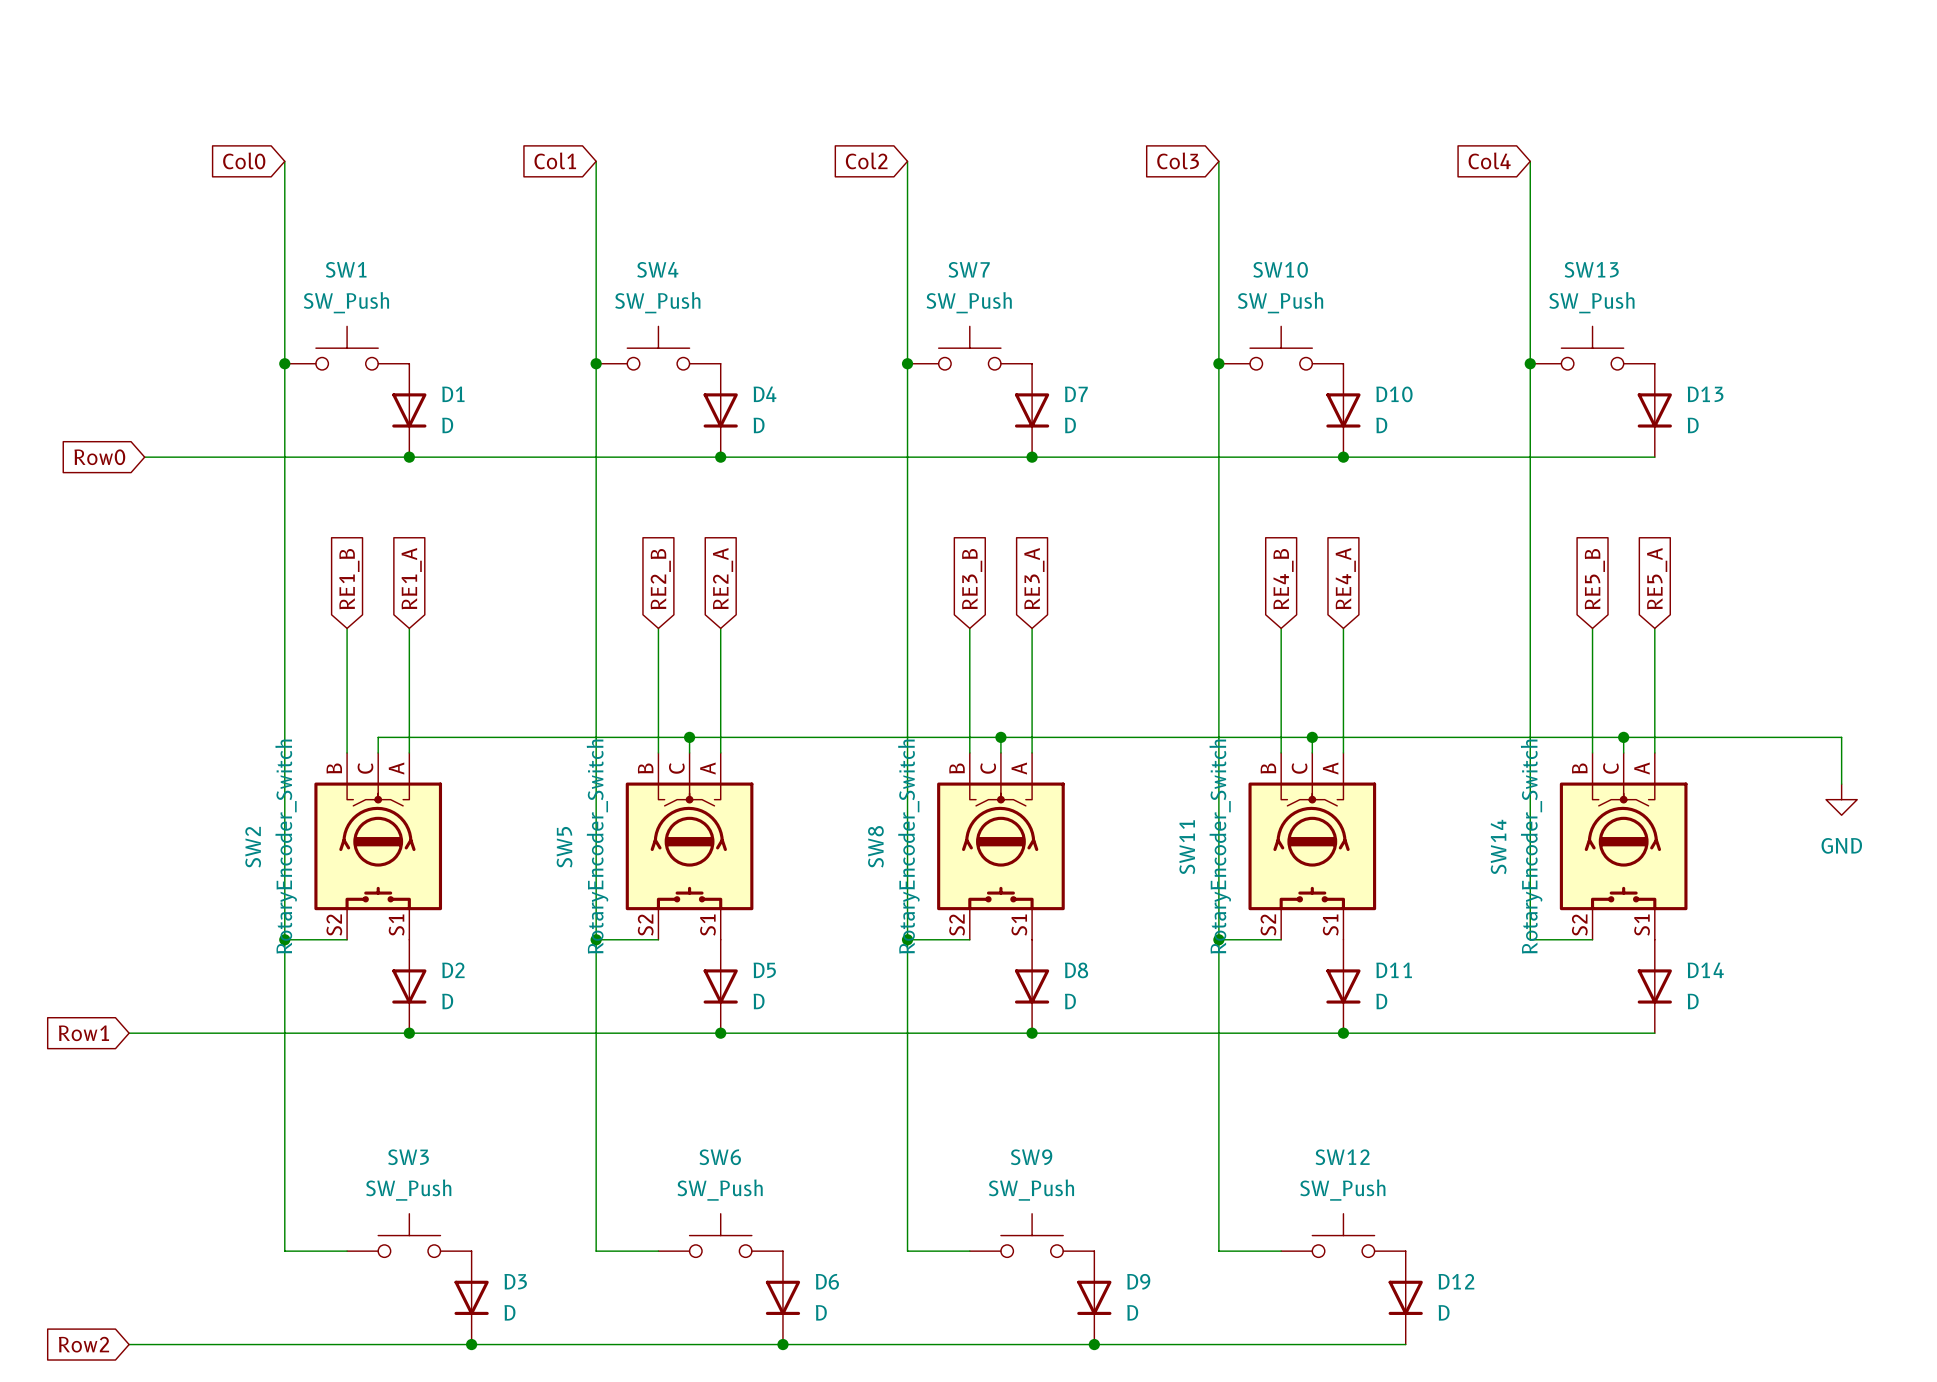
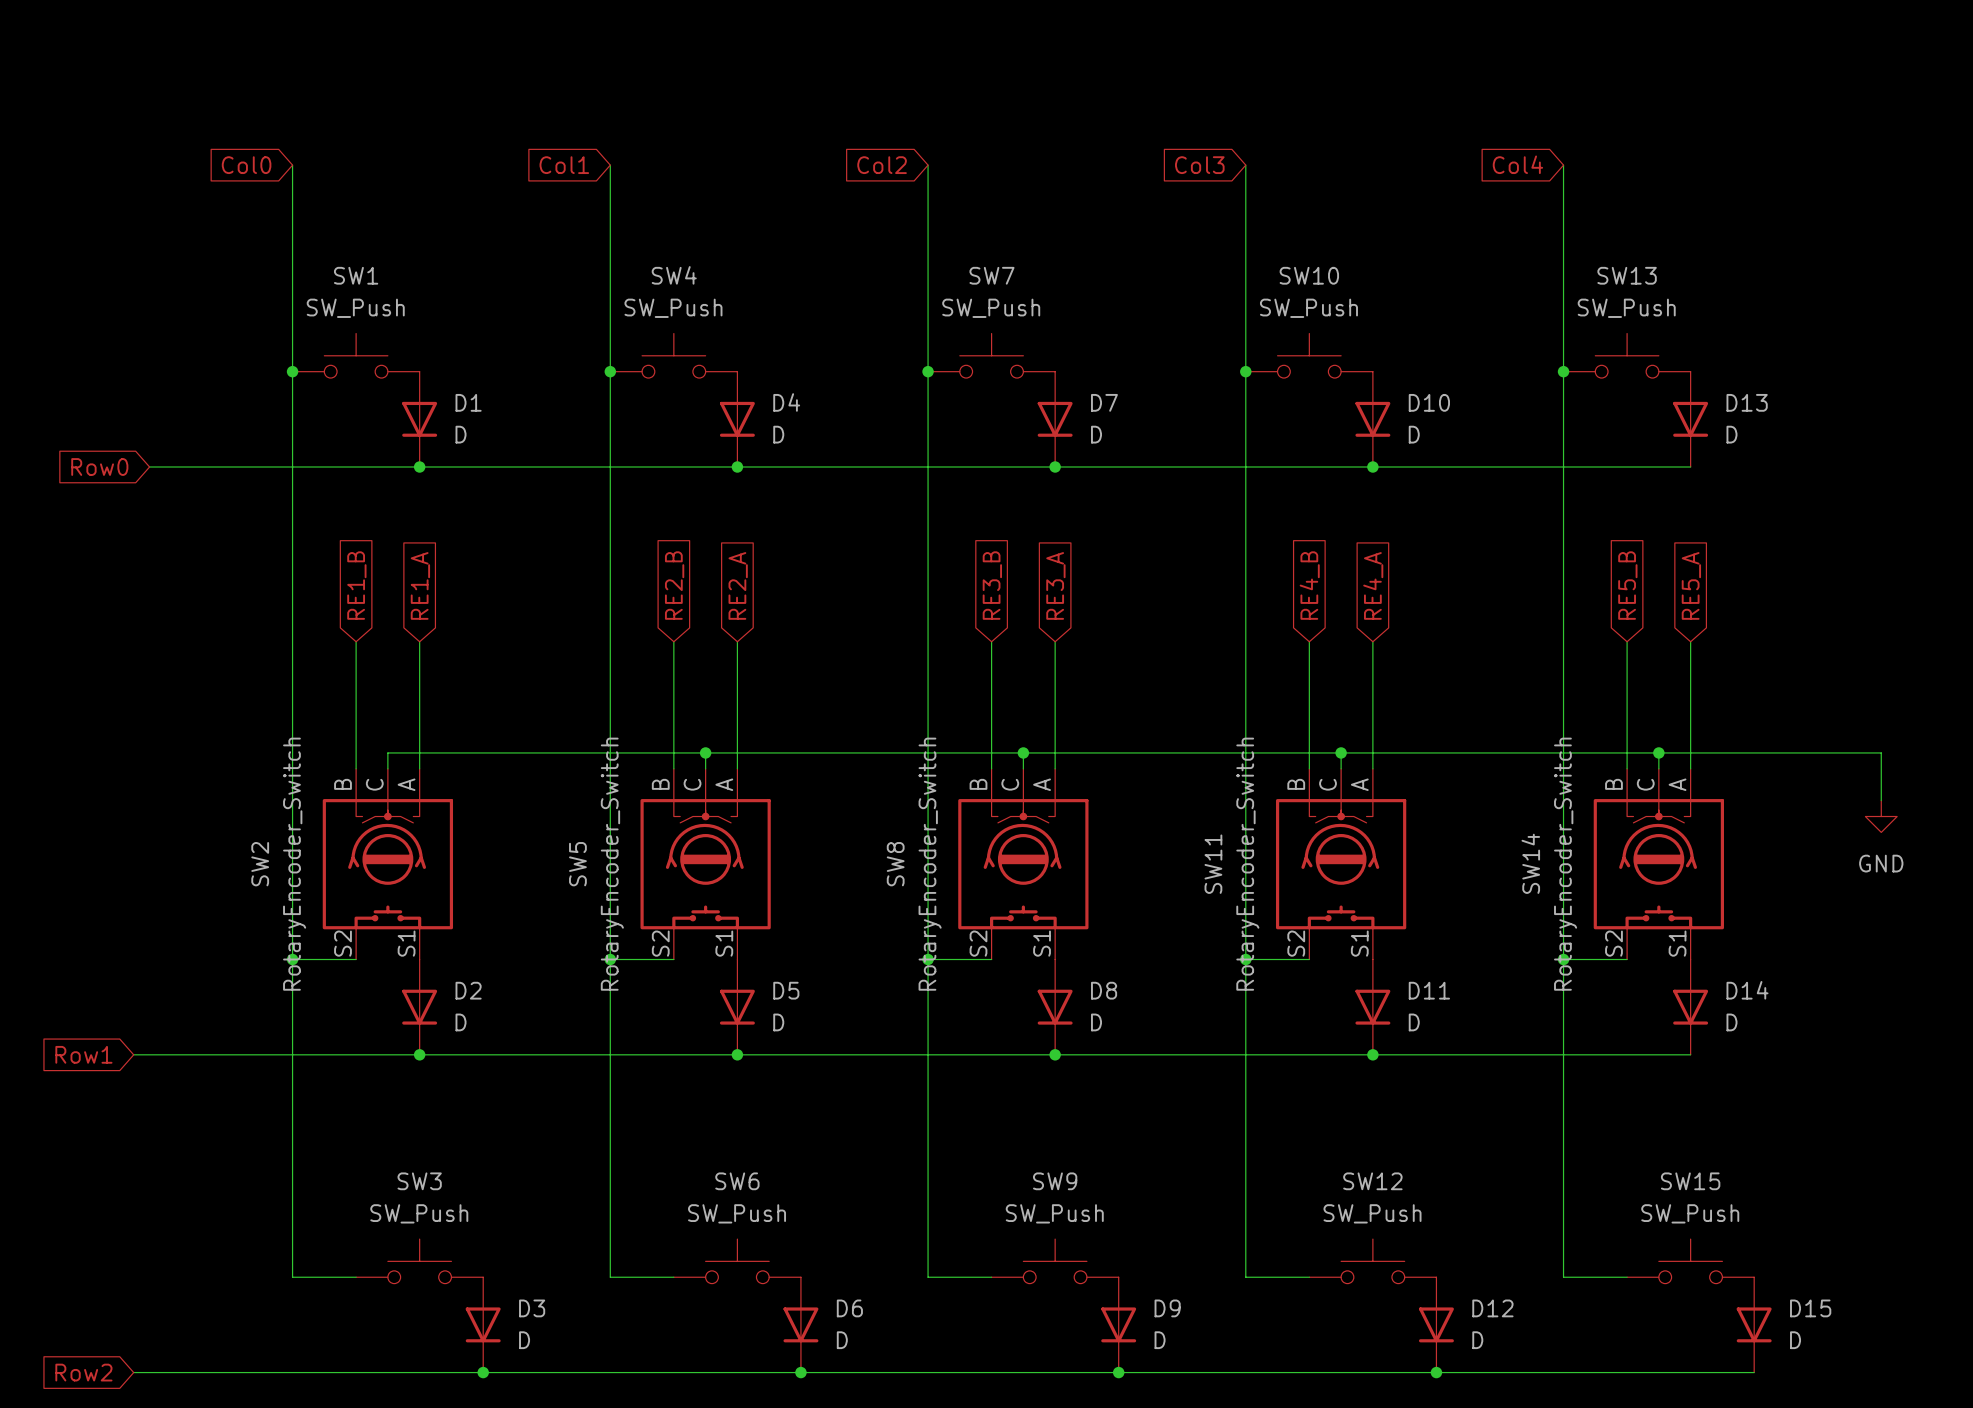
wire: none -> (1563, 959) (1563, 1277) (1627, 1277)
junction: none -> (1563, 959)
SW15: none -> SW_Push (1690, 1261)
D15: none -> D (1754, 1324)
wire: none -> (1436, 1372) (1754, 1372)
junction: none -> (1436, 1372)

